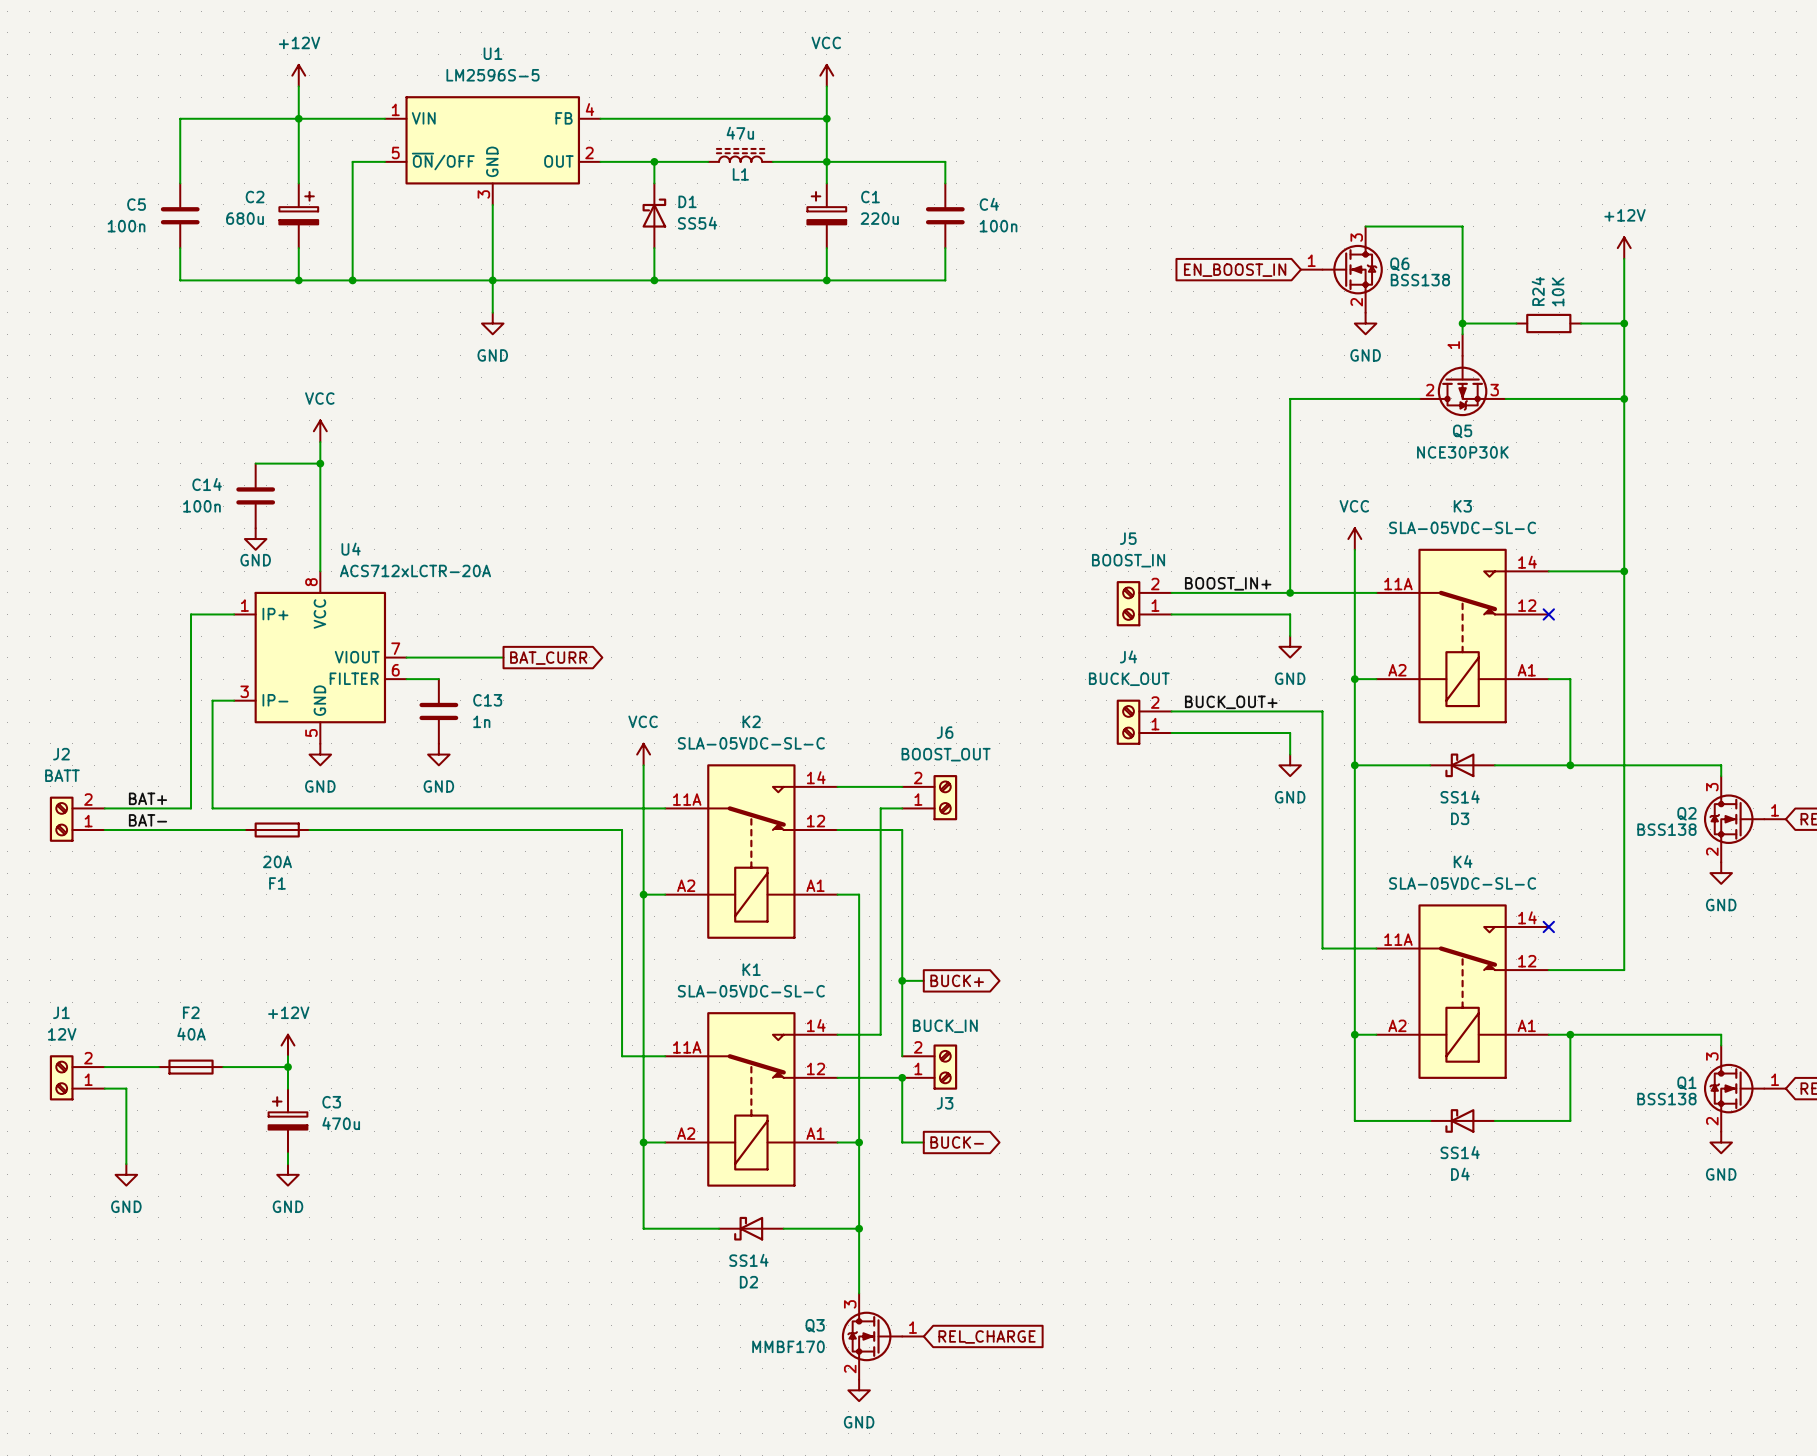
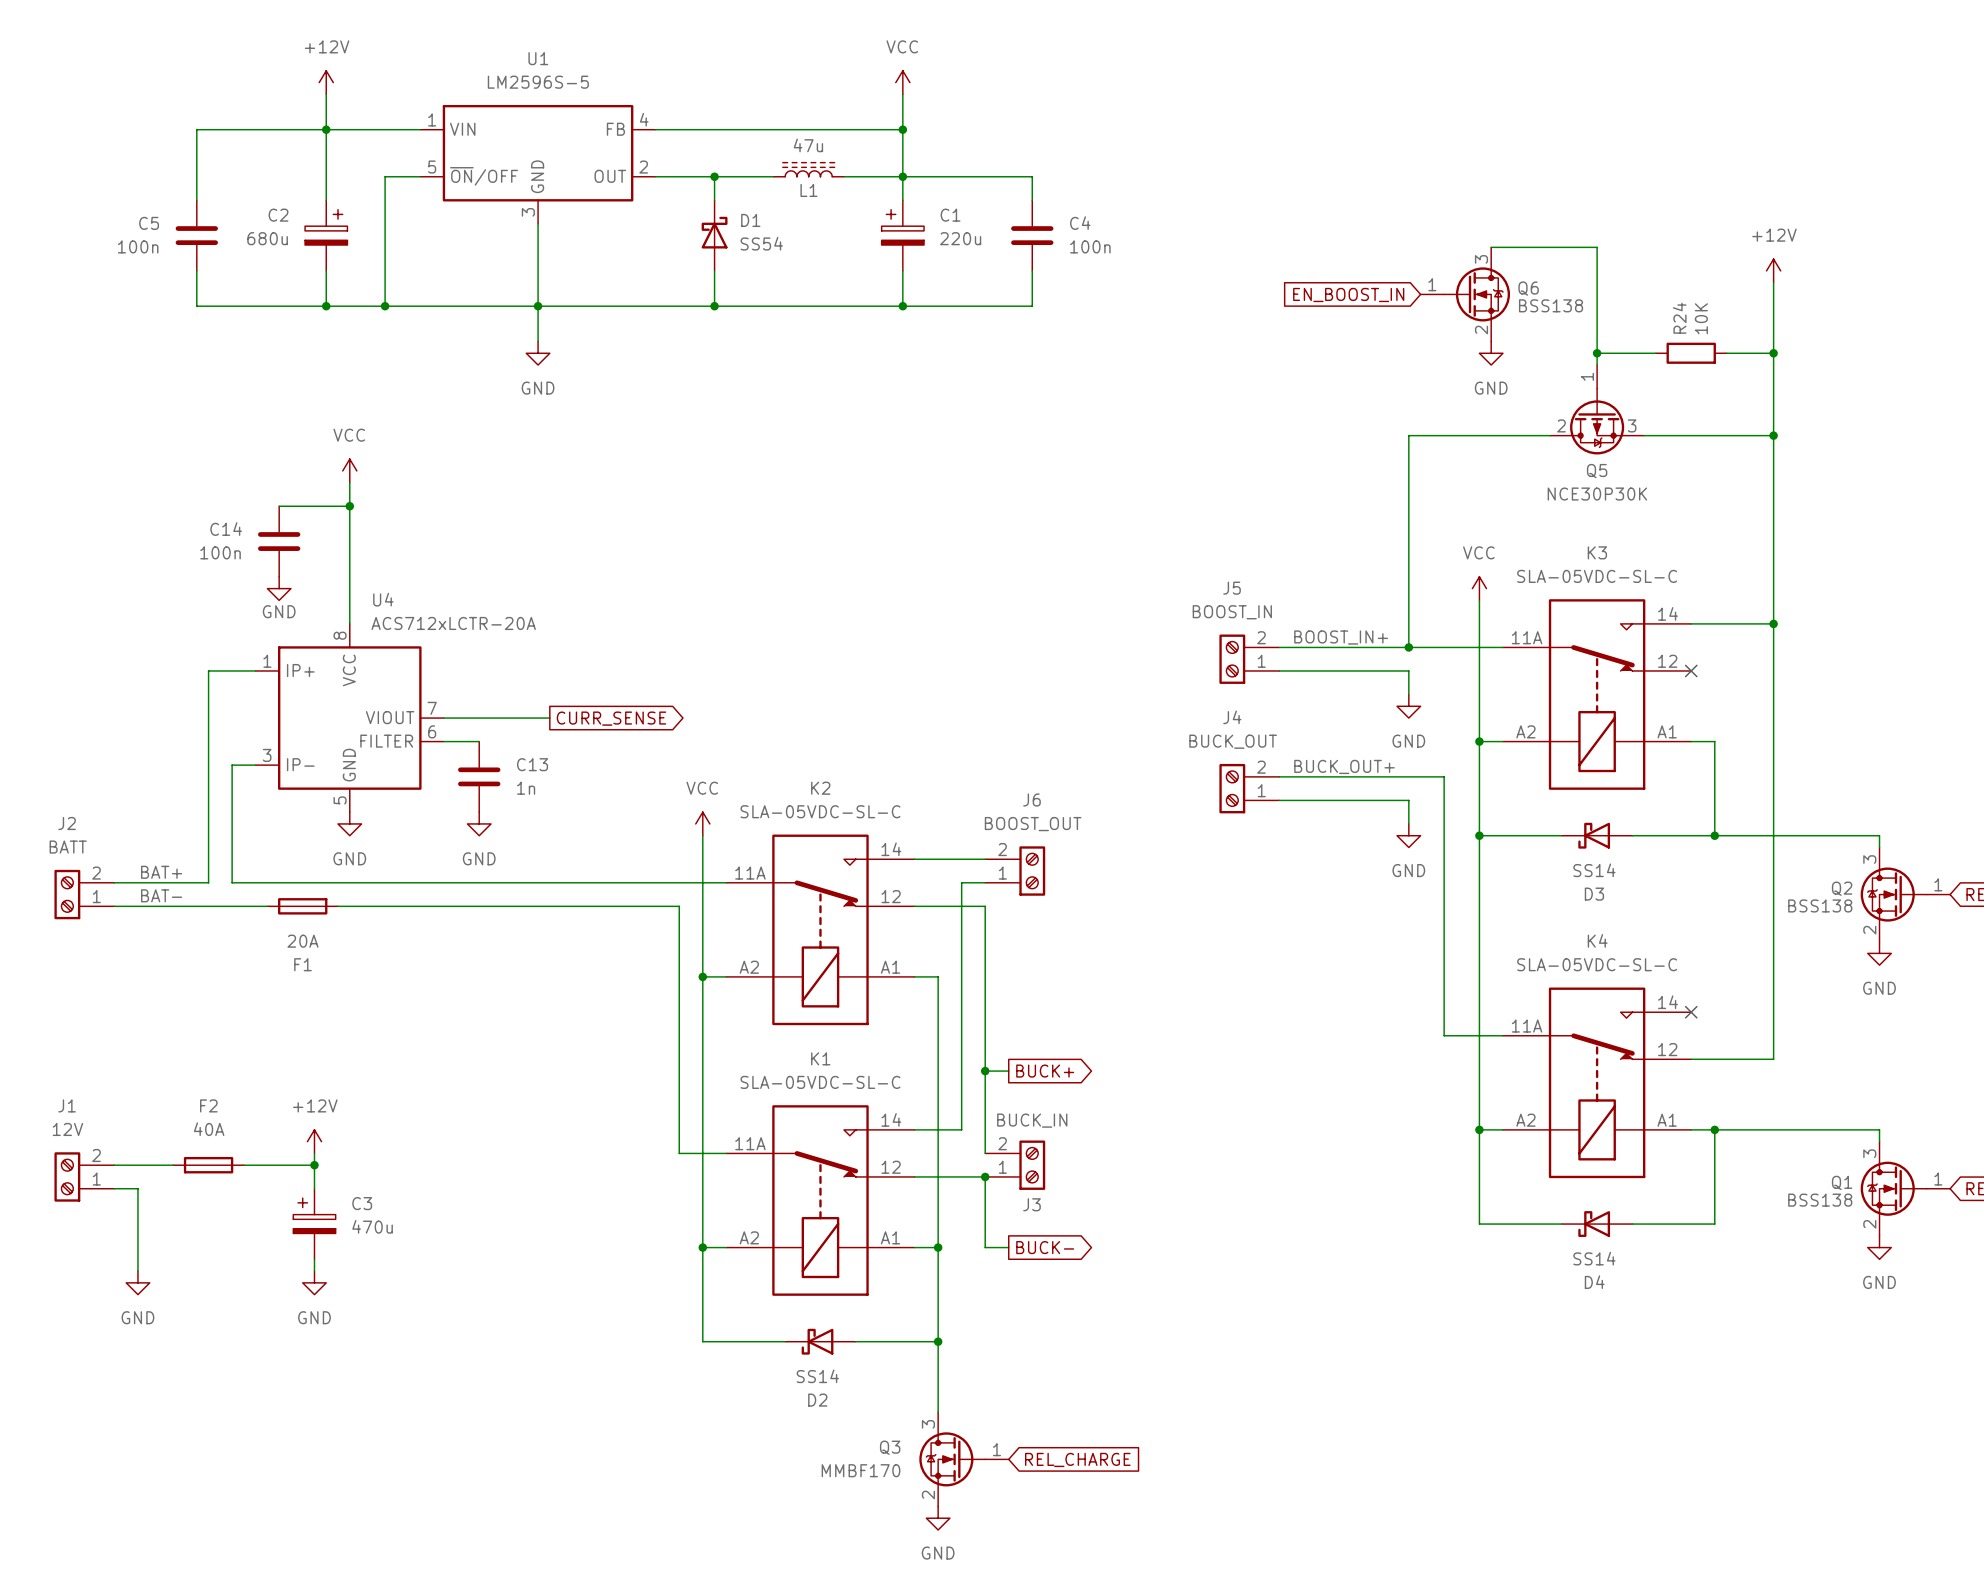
global label: BAT_CURR (548, 658) -> CURR_SENSE (611, 718)

